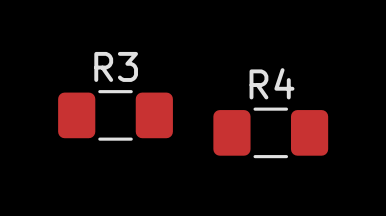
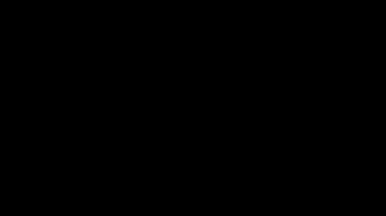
R3: (115, 115) -> none
R4: (270, 132) -> none

